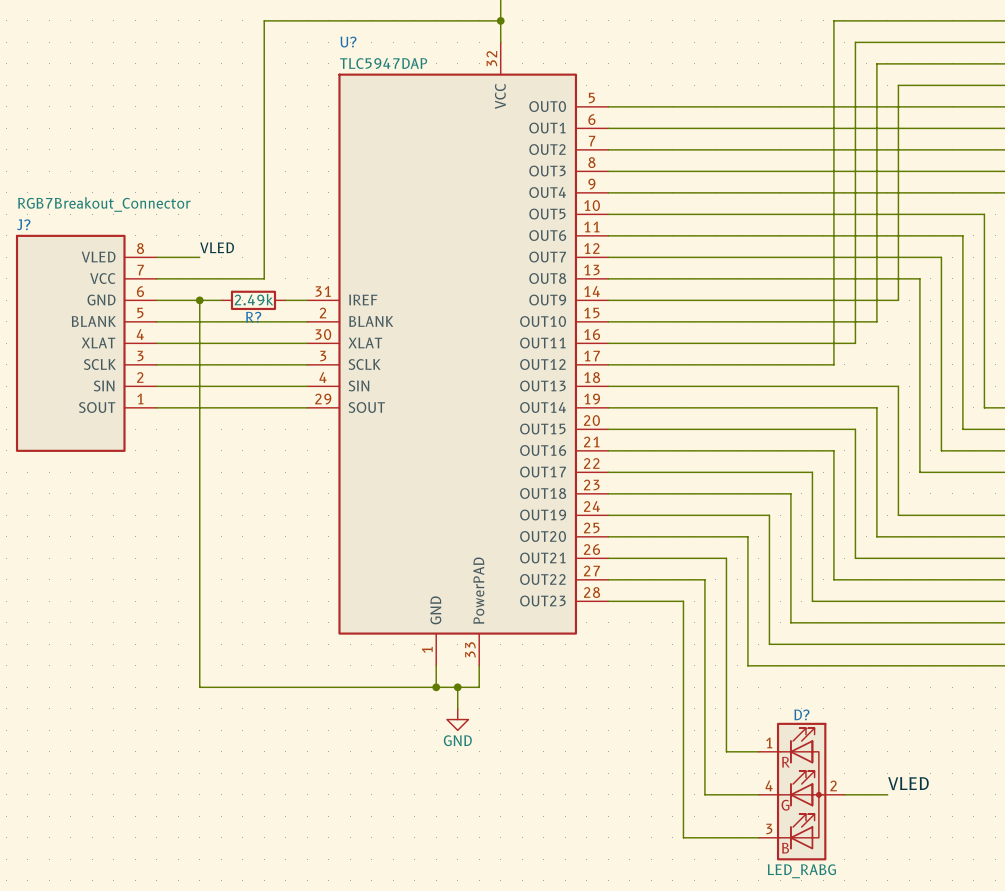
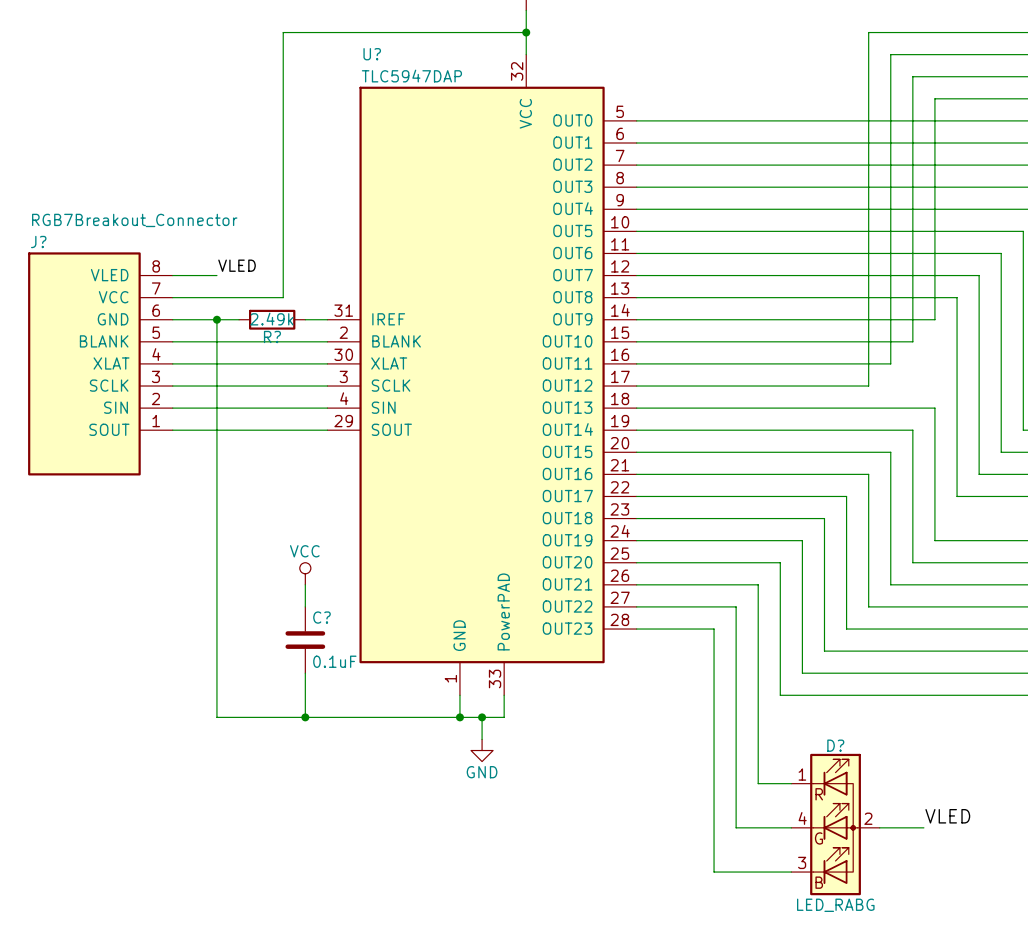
power symbol: none -> VCC (305, 573)
wire: none -> (305, 584) (305, 606)
C?: none -> 0.1uF (305, 640)
wire: none -> (305, 673) (305, 717)
junction: none -> (305, 717)

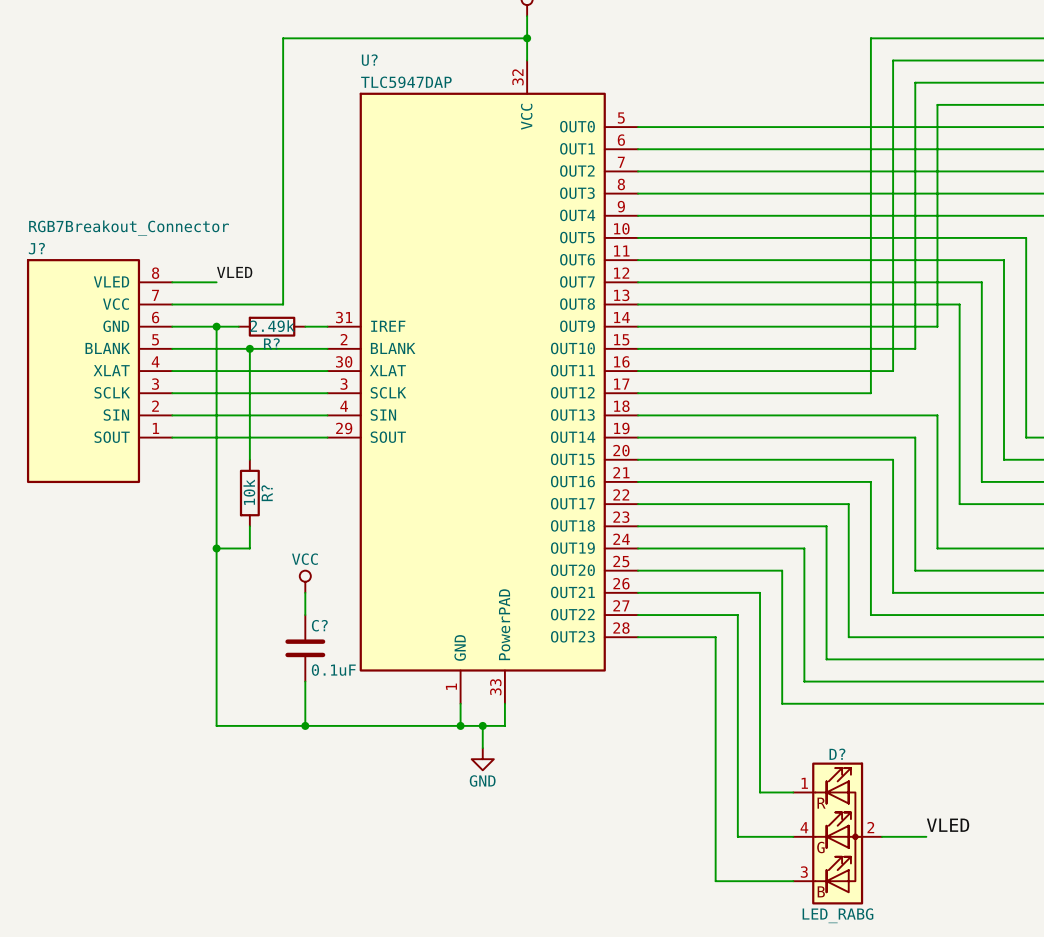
wire: none -> (249, 348) (249, 459)
junction: none -> (249, 348)
R?: none -> 10k (249, 493)
wire: none -> (249, 526) (249, 548) (216, 548)
junction: none -> (216, 548)

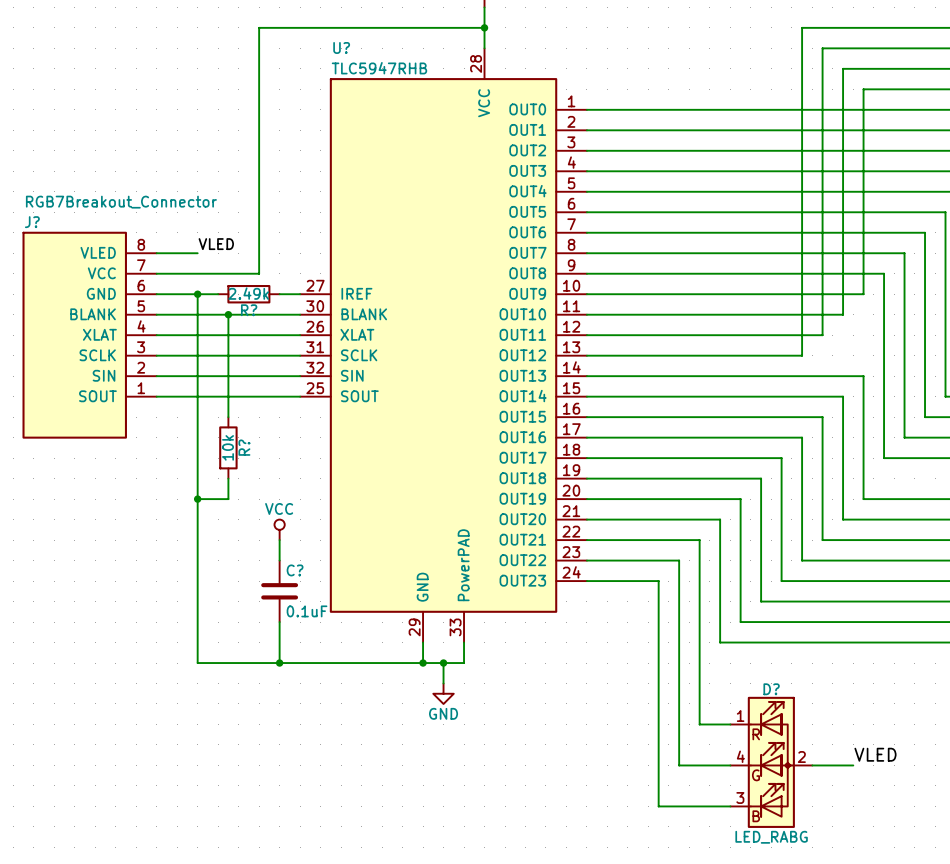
U? symbol: [327, 60, 639, 704] -> [300, 48, 587, 643]
U? value: TLC5947DAP (406, 82) -> TLC5947RHB (379, 68)

